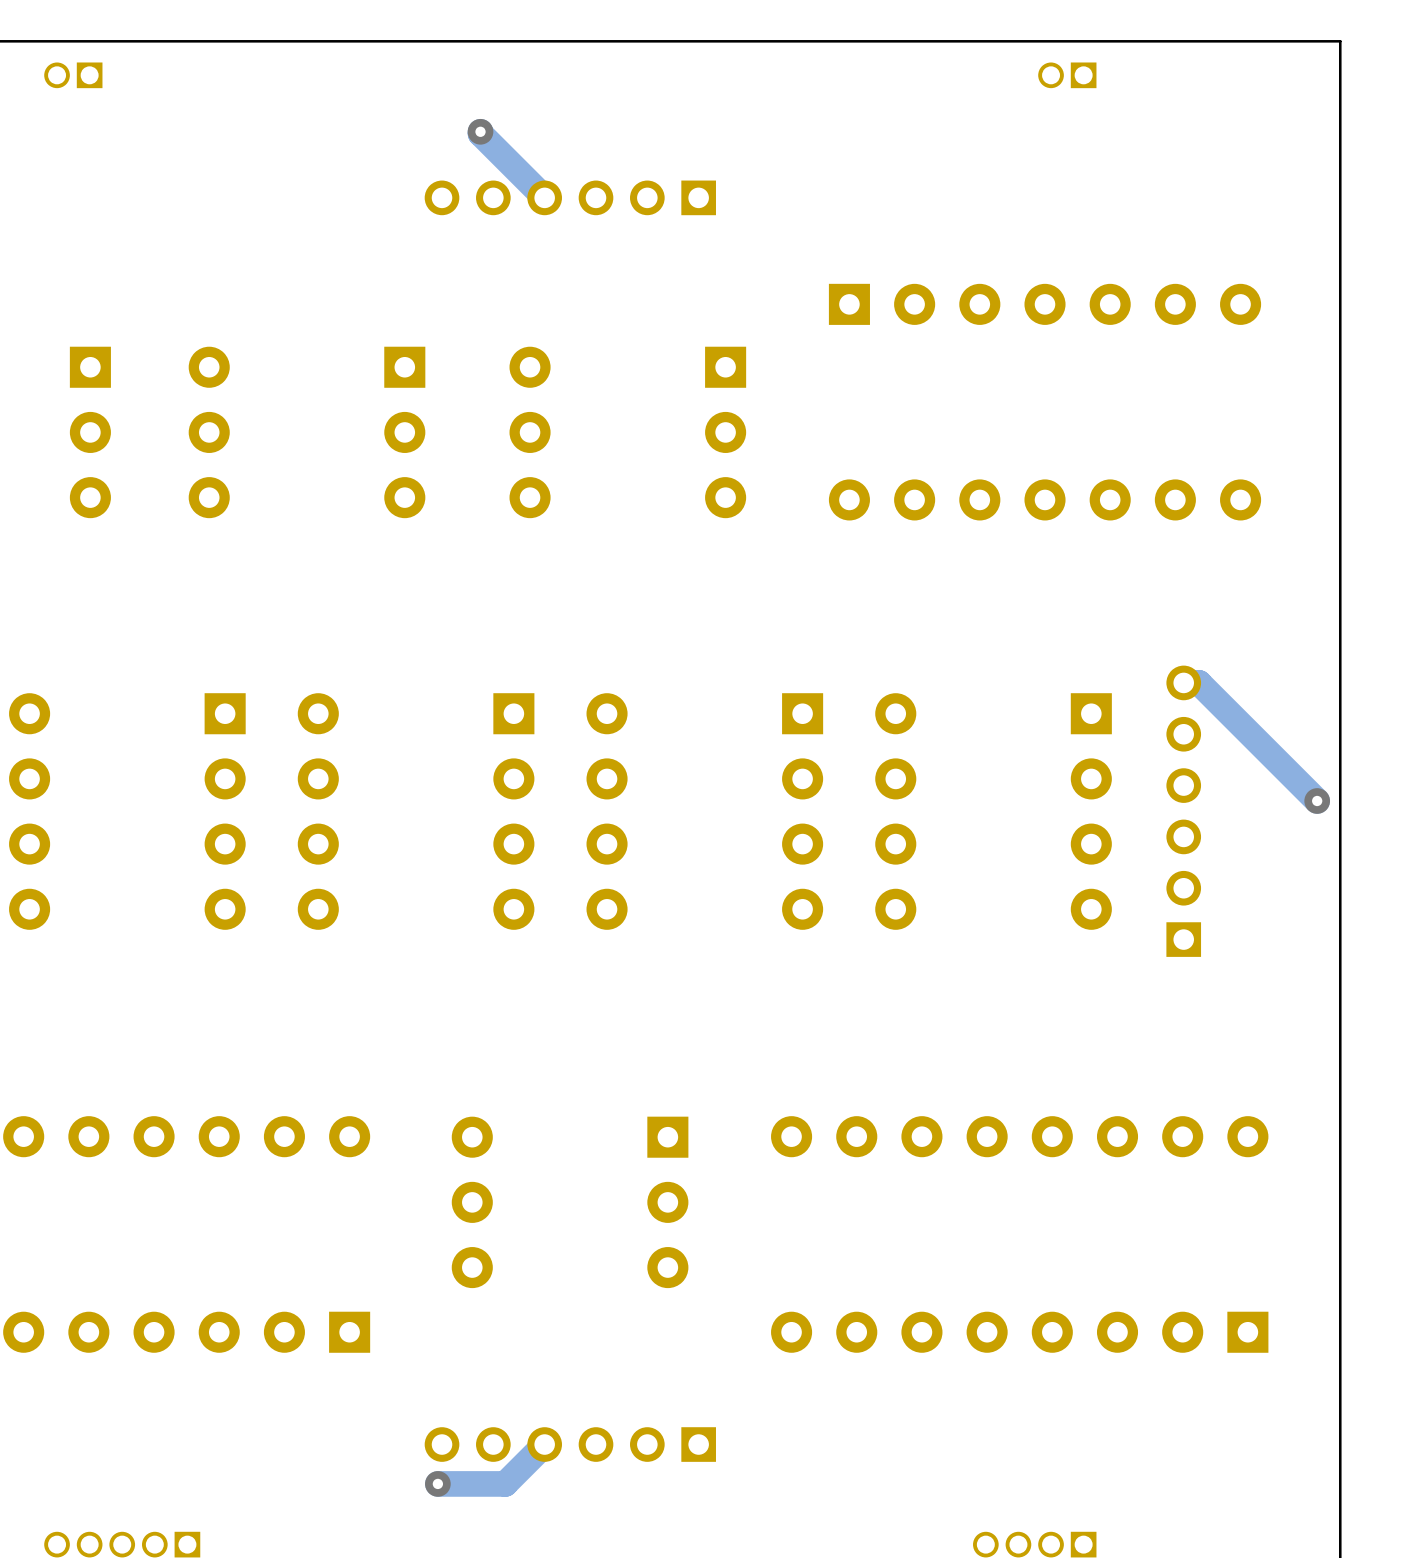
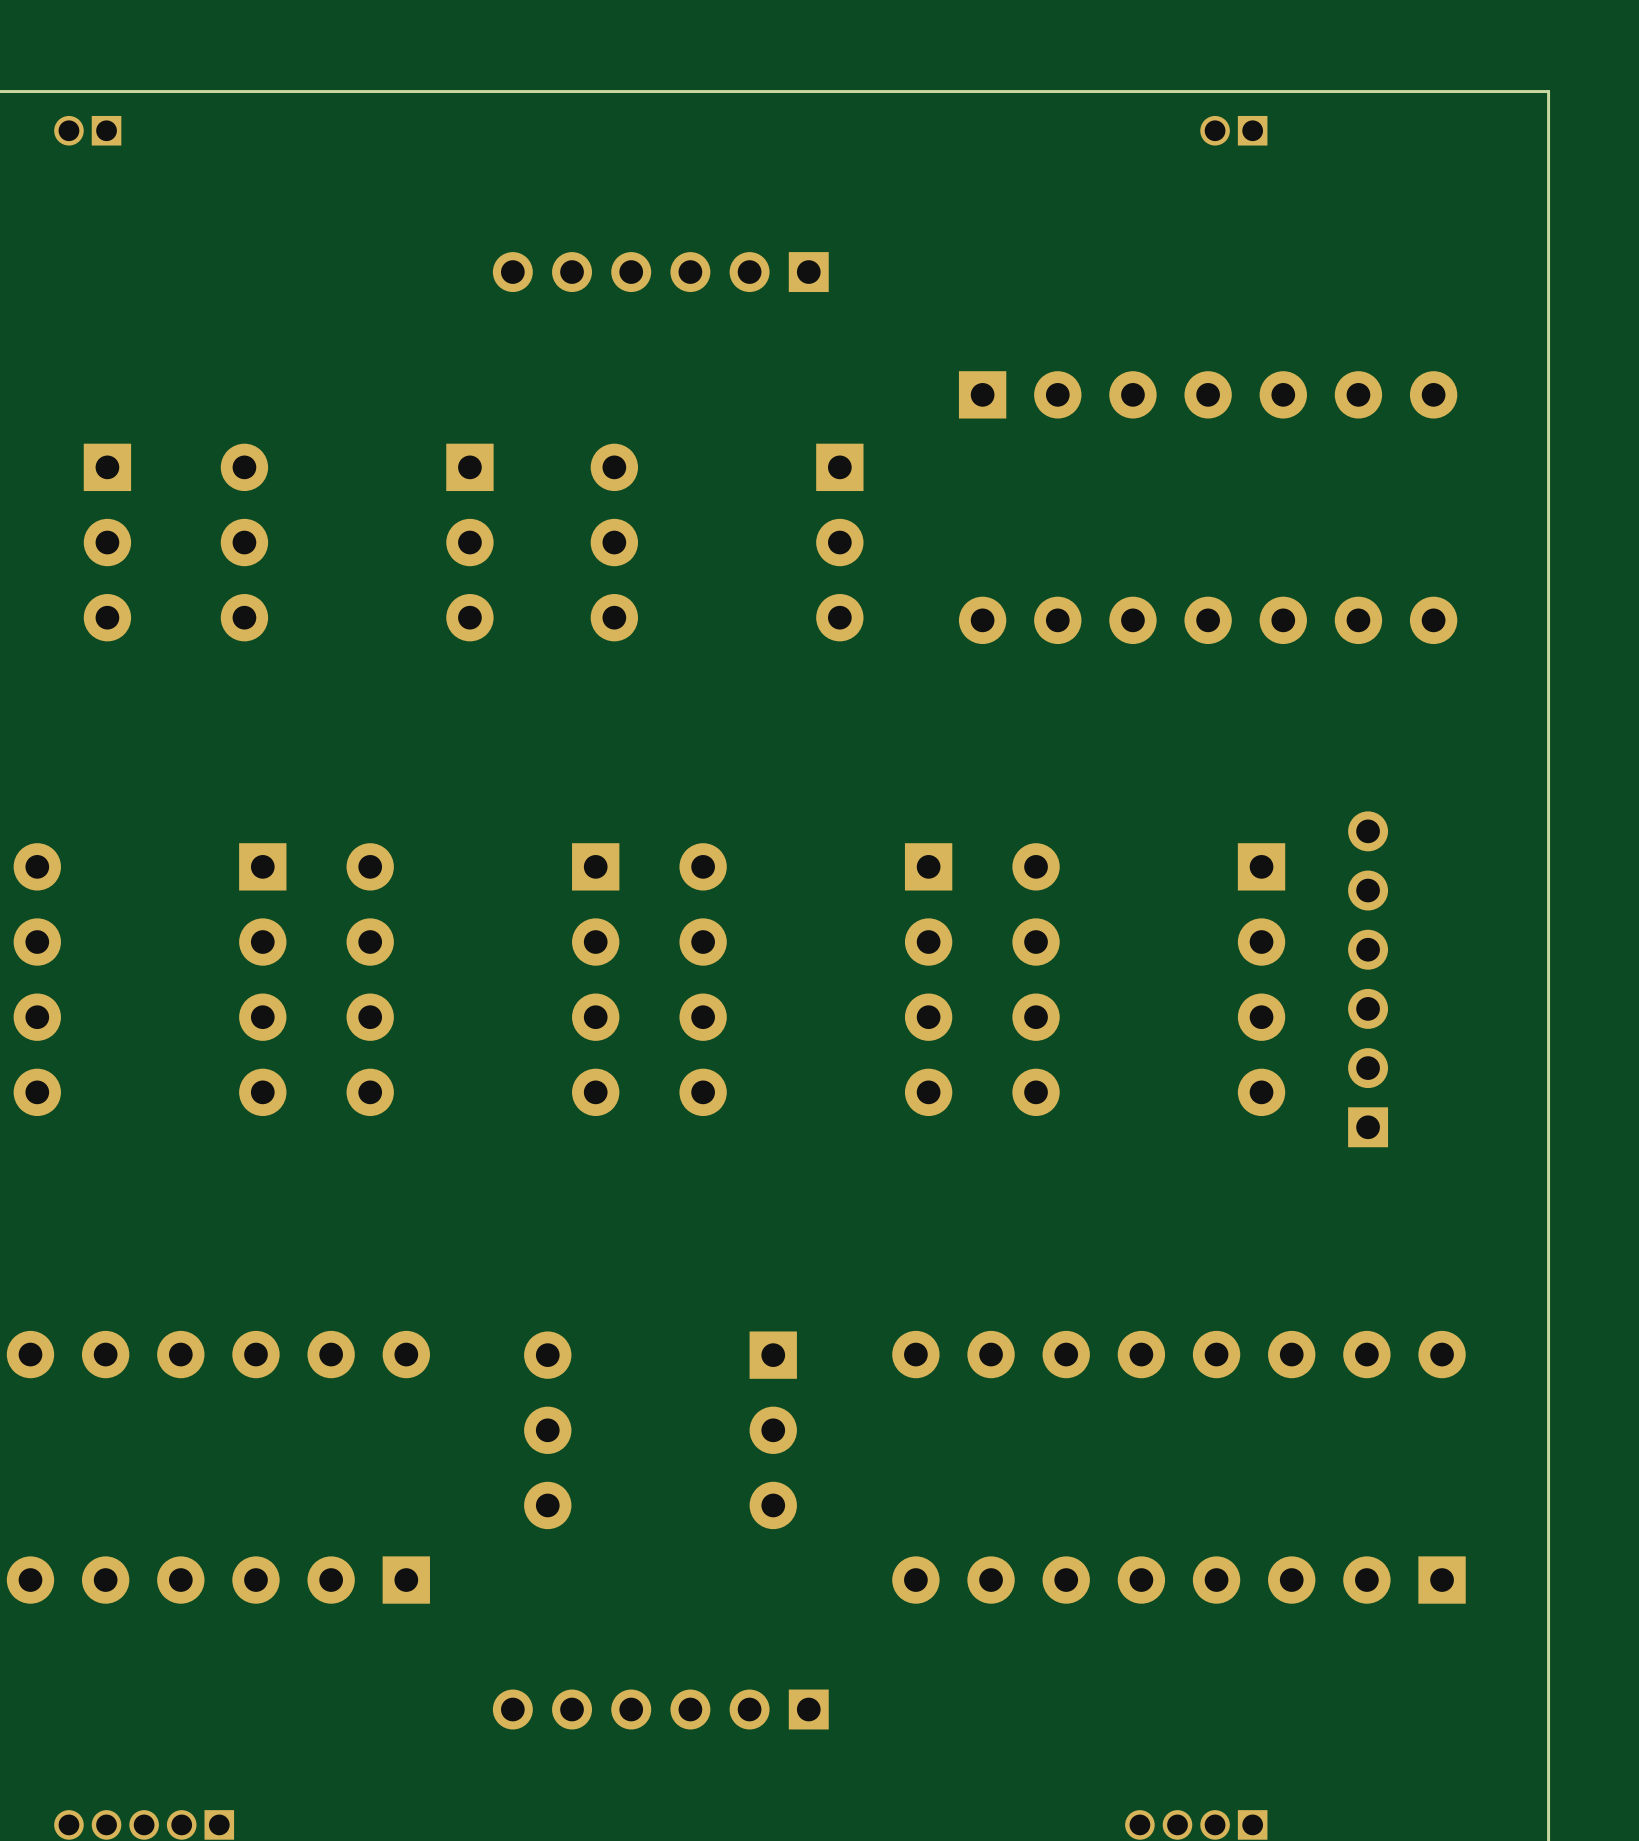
track: (480, 131) (544, 197) -> none
via: (480, 131) -> none
track: (1183, 682) (1199, 682) (1317, 800) -> none
via: (1317, 800) -> none
track: (544, 1444) (505, 1483) (437, 1483) -> none
via: (437, 1483) -> none

